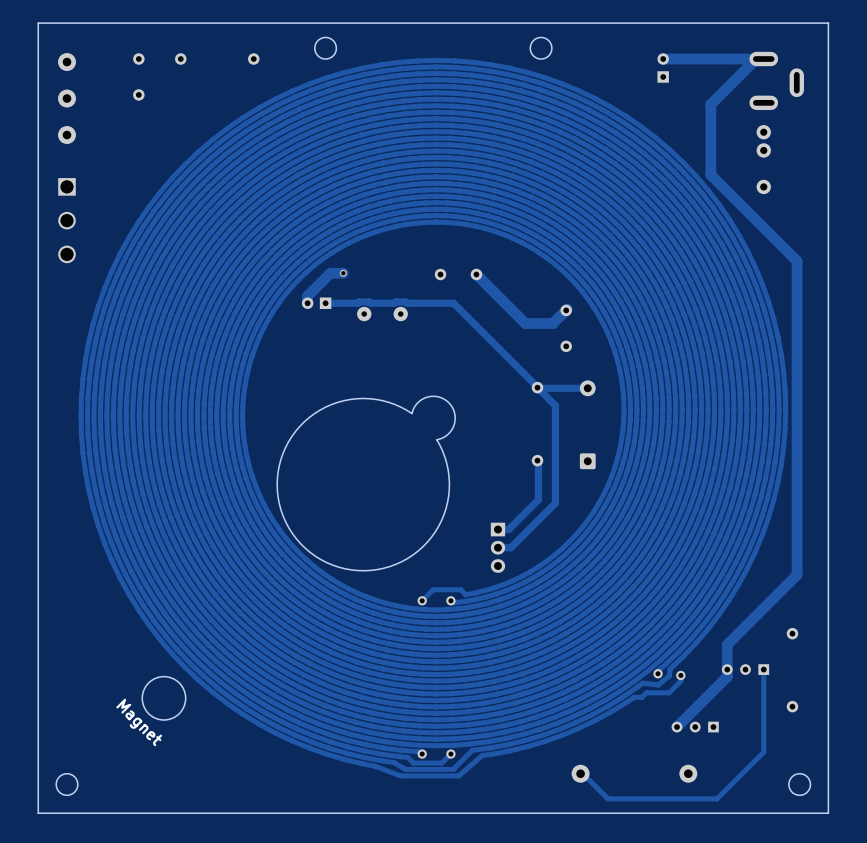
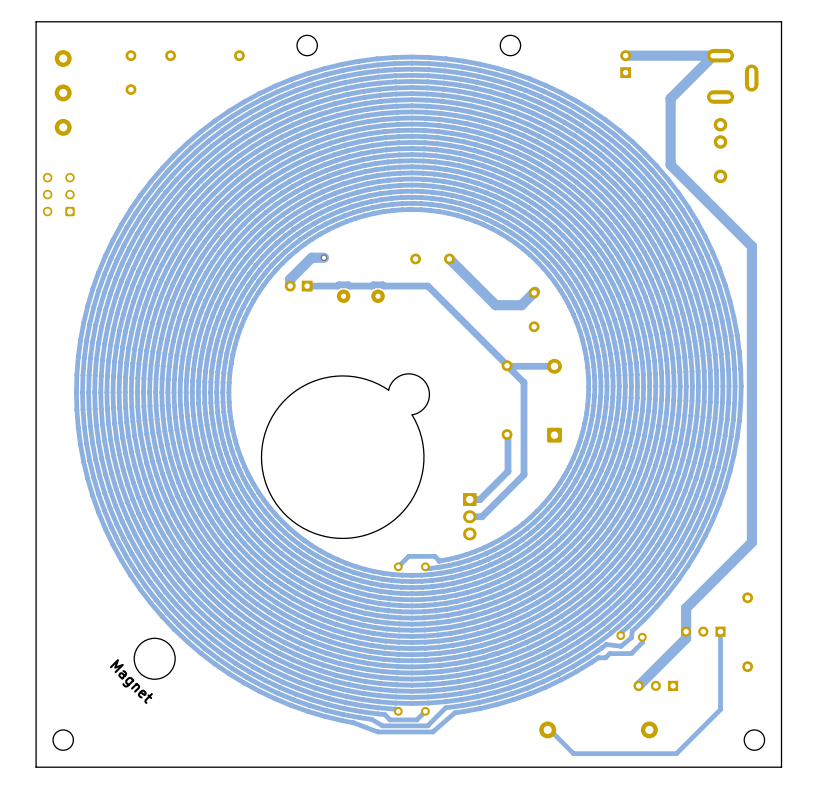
part: none -> (58, 194)
part: (67, 220) -> none

